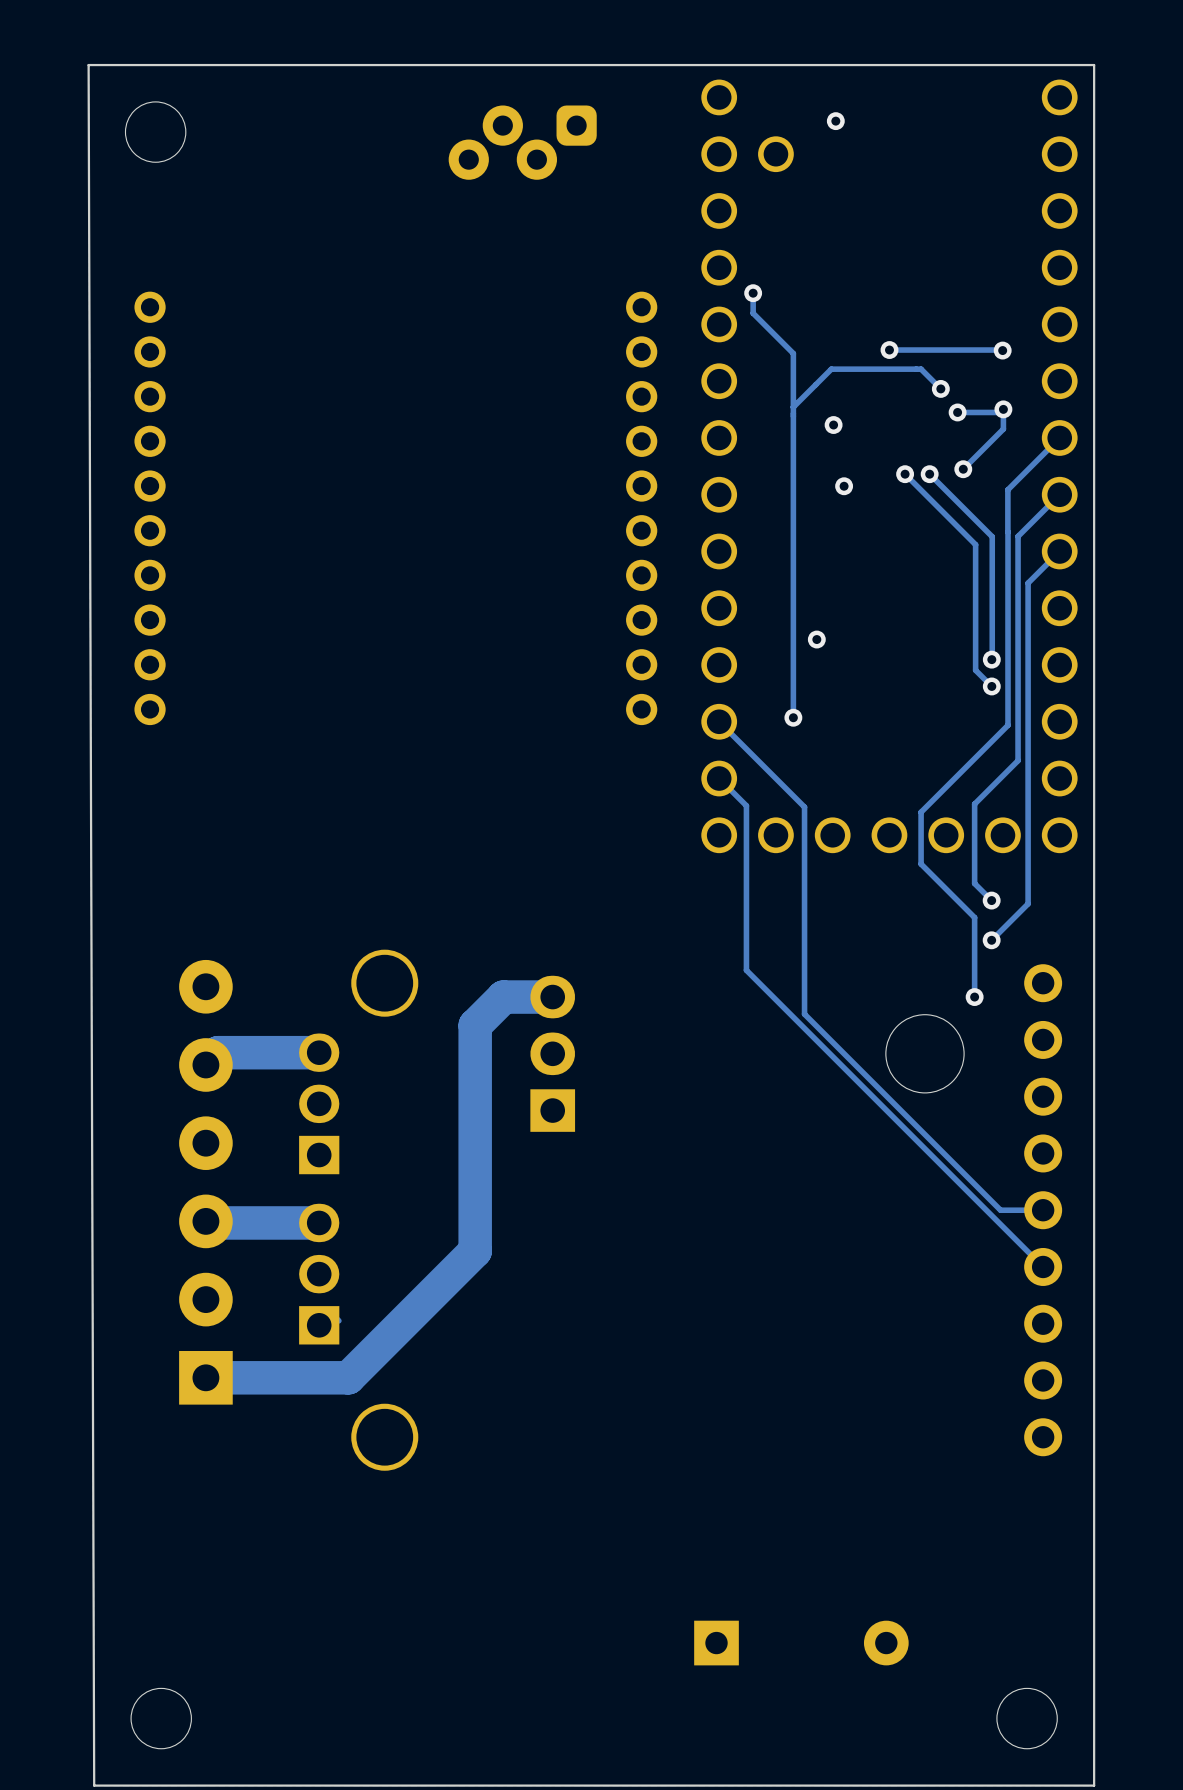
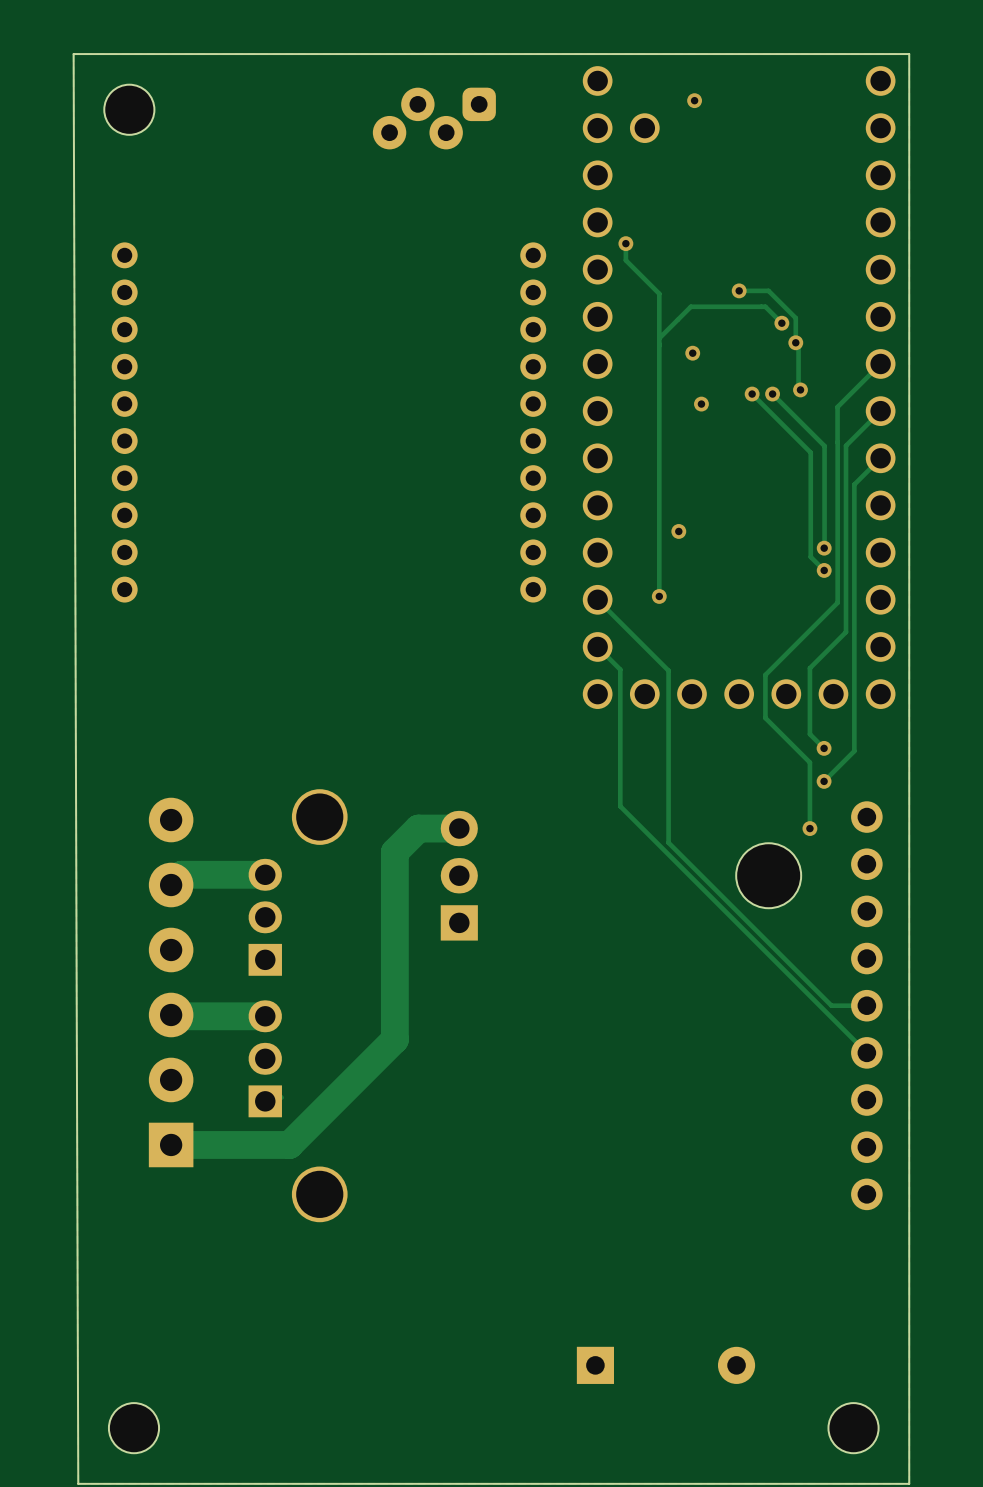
track: (924, 350) (1002, 350) -> (768, 290) (795, 318) (795, 342) (798, 345) (798, 392) (800, 394)
via: (1002, 350) -> none
via: (1003, 409) -> none
track: (957, 412) (1000, 412) (1003, 409) (1003, 429) (963, 469) -> none

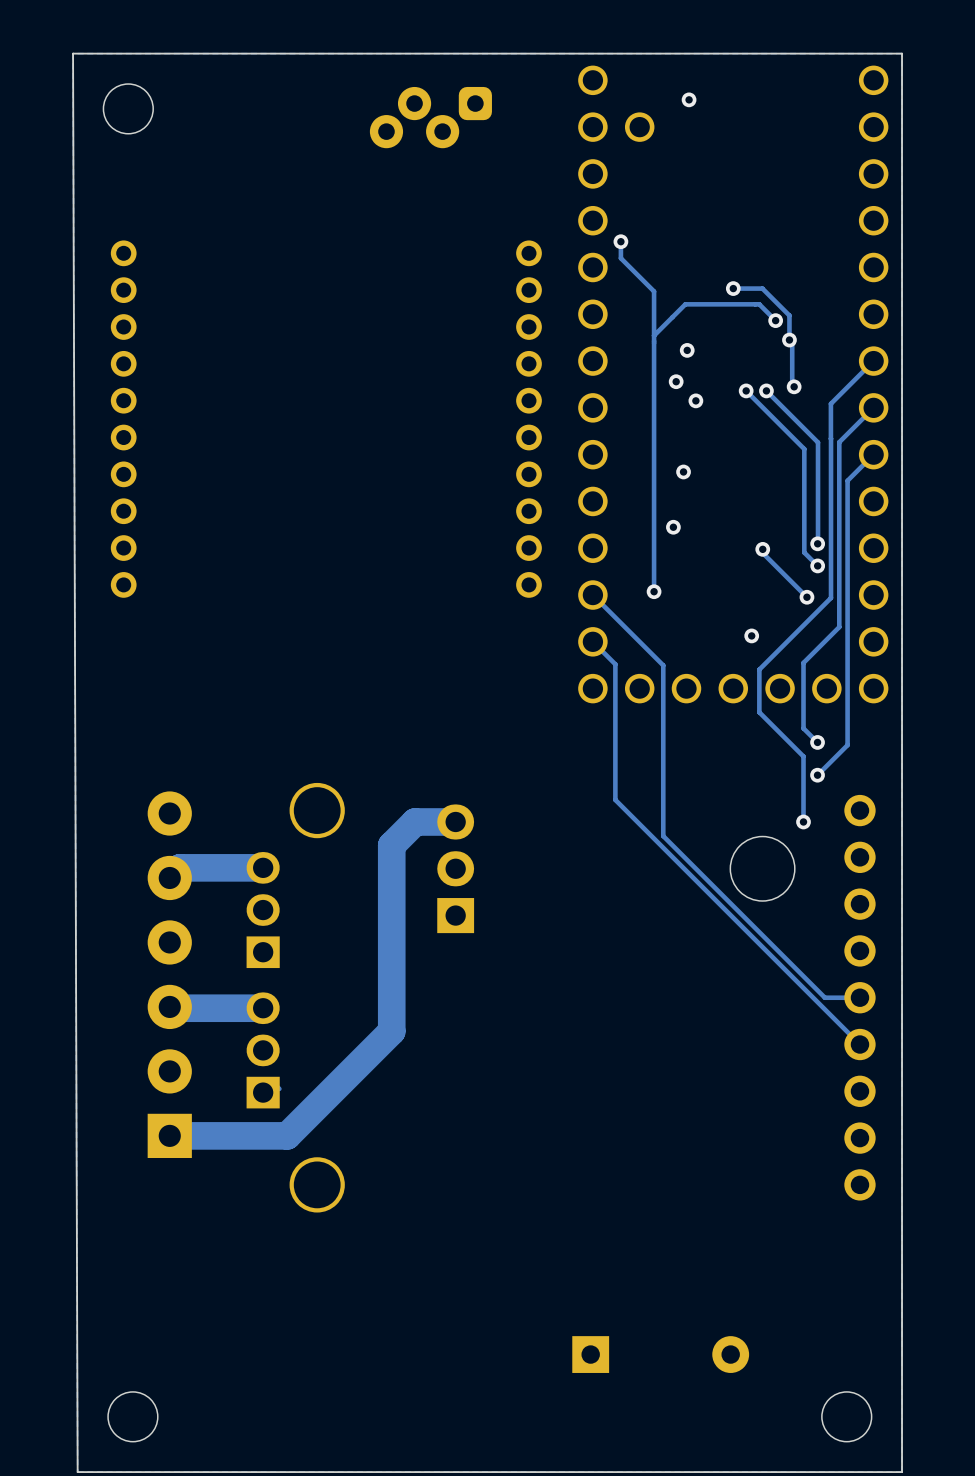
via: none -> (676, 381)
via: none -> (683, 471)
track: none -> (762, 549) (762, 553) (806, 597)
via: none -> (762, 549)
via: none -> (806, 597)
via: none -> (751, 635)

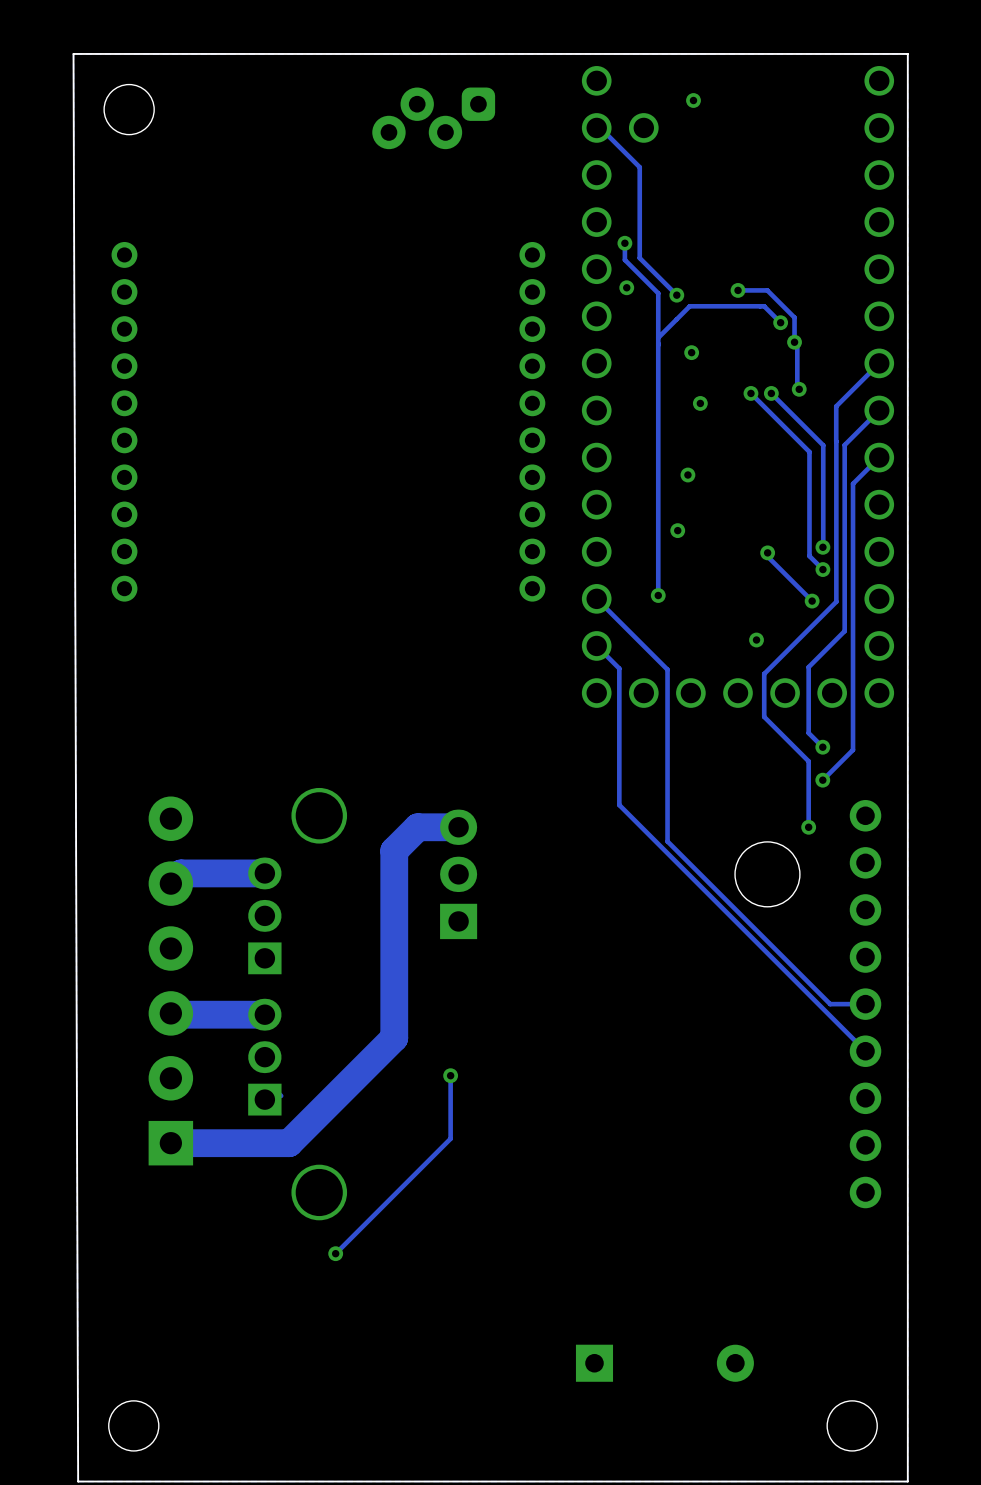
track: none -> (596, 127) (600, 127) (639, 167) (639, 258) (676, 295)
via: none -> (626, 287)
via: none -> (676, 295)
via: (676, 381) -> none
track: none -> (450, 1075) (450, 1138) (335, 1253)
via: none -> (450, 1075)
via: none -> (335, 1253)

